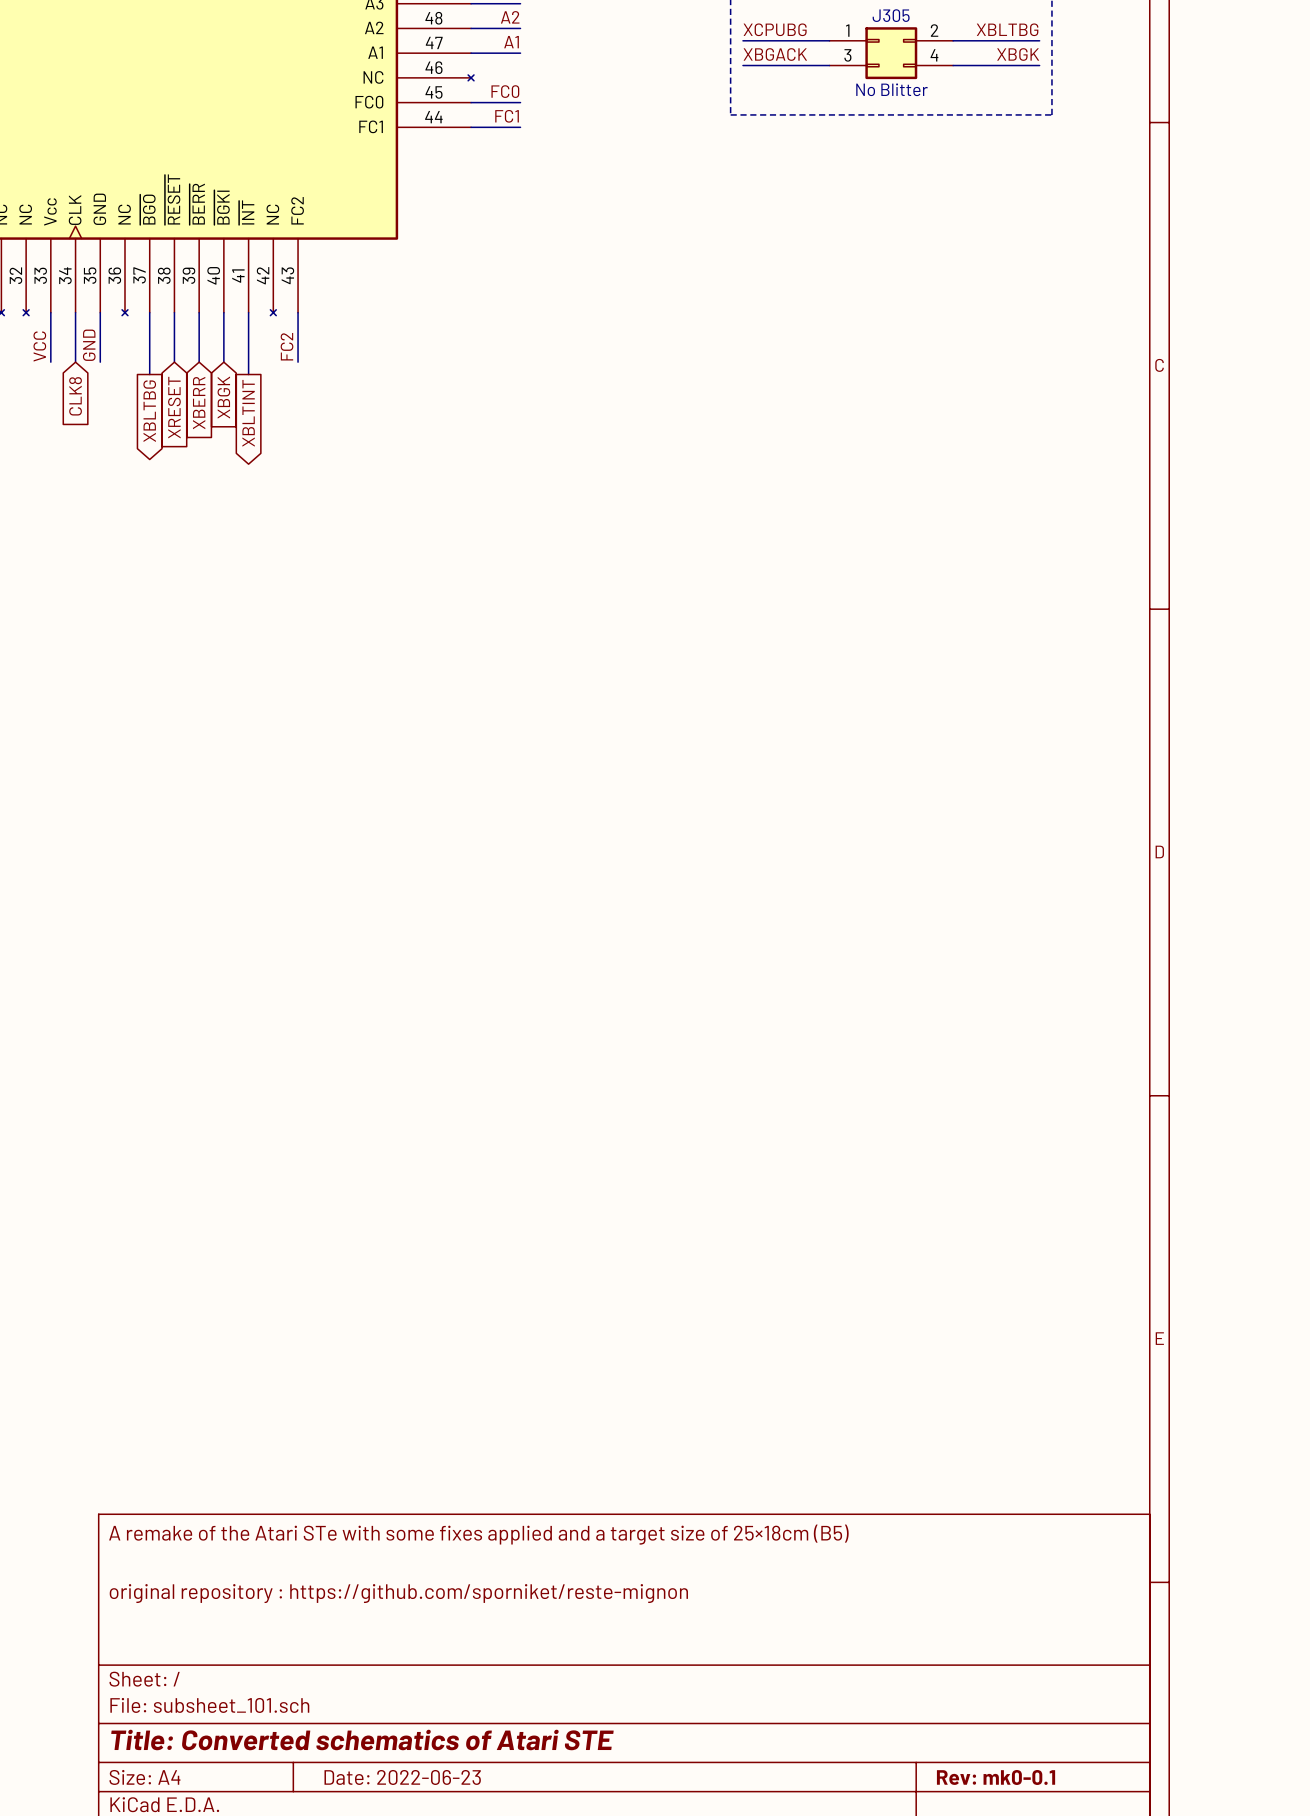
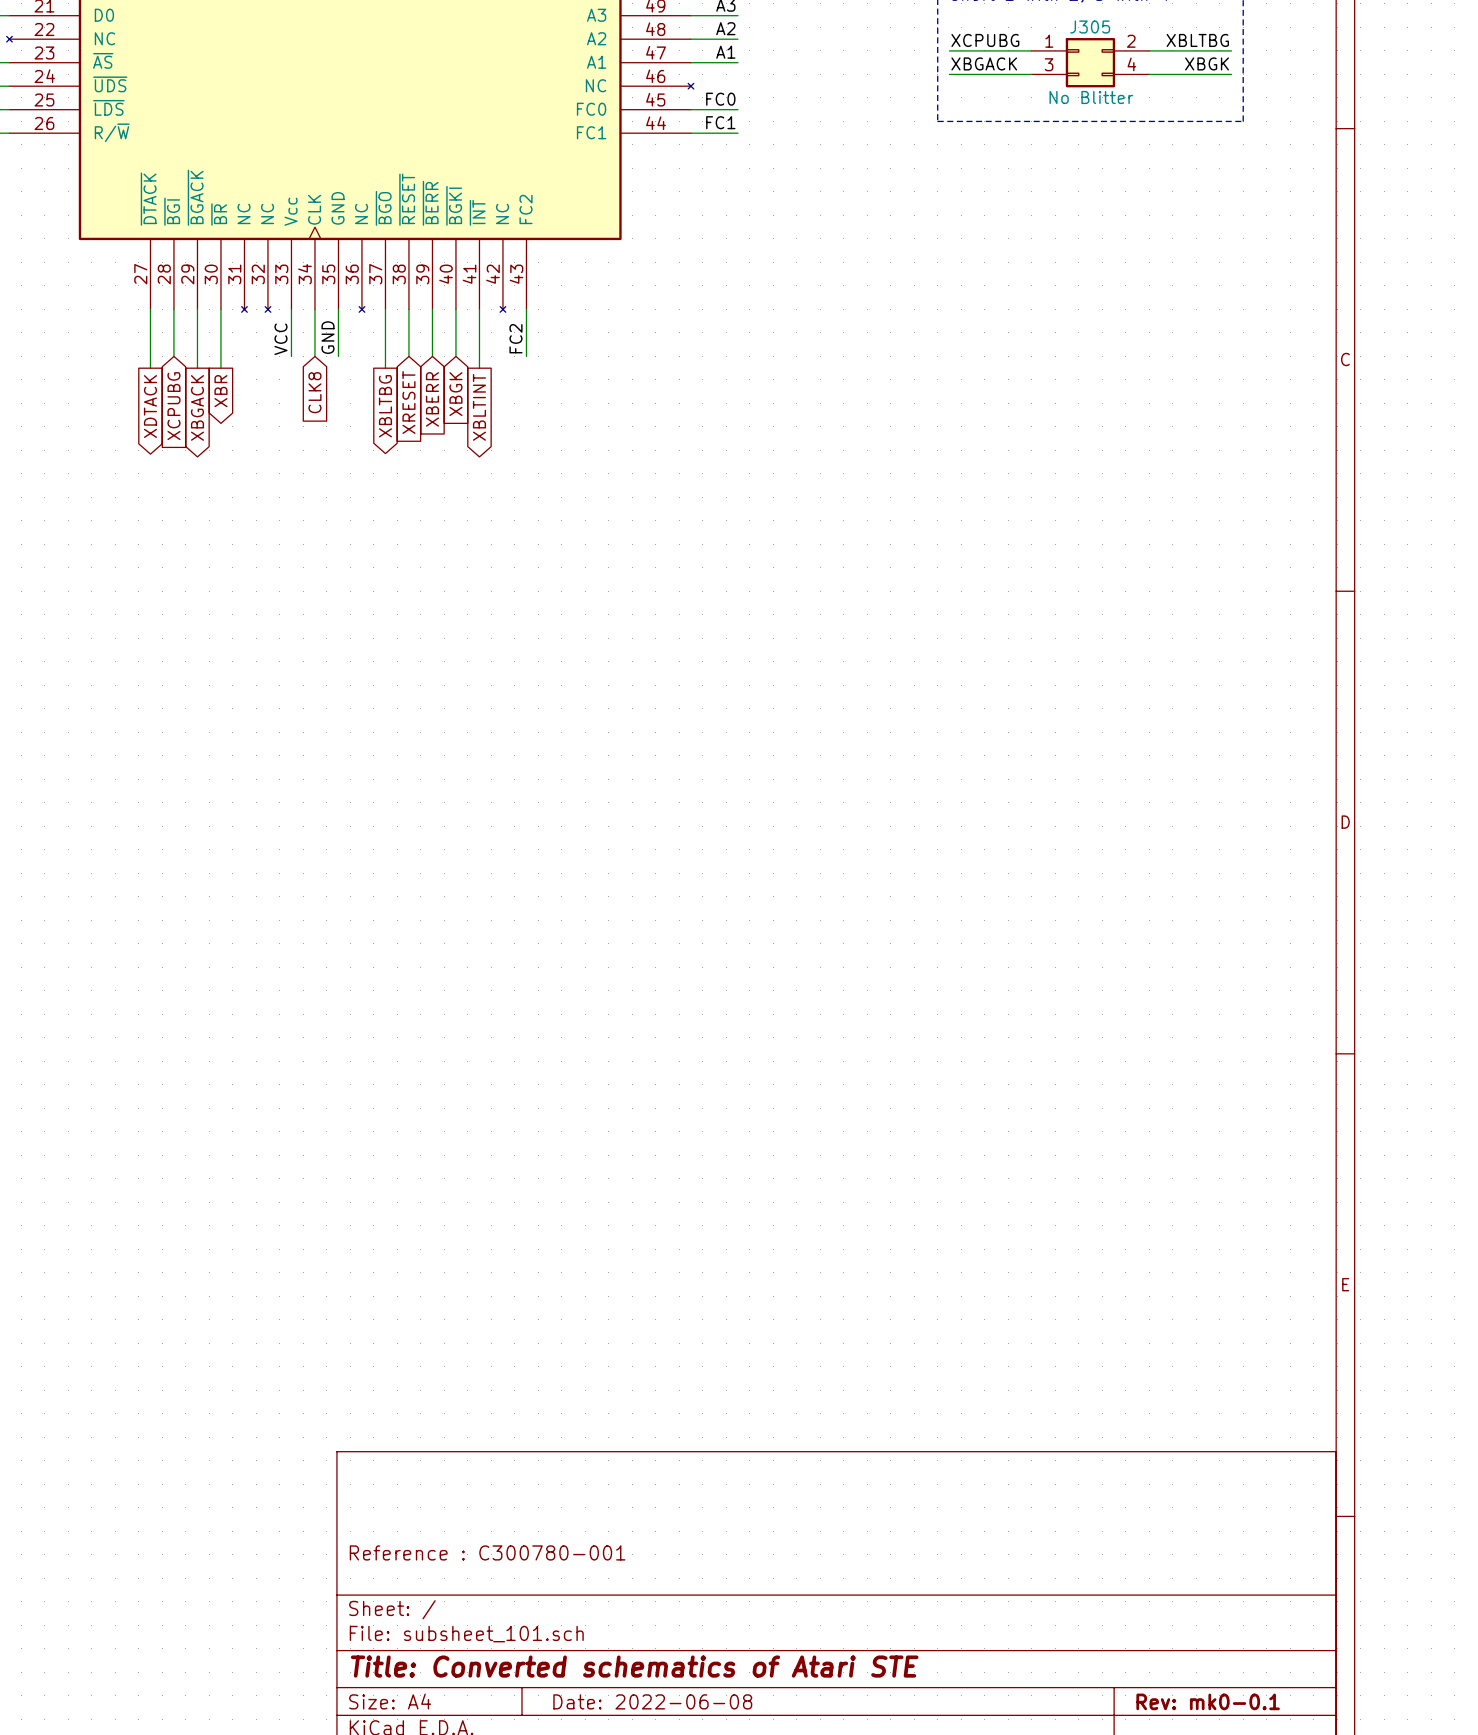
title block: A remake of the Atari STe with some fixes applied and a target size of 25×18cm (B5) (478, 1534) -> none
title block: original repository : https://github.com/sporniket/reste-mignon (398, 1593) -> none
title block: none -> Reference : C300780-001 (487, 1552)
title block: Date: 2022-06-23 (402, 1777) -> Date: 2022-06-08 (652, 1701)

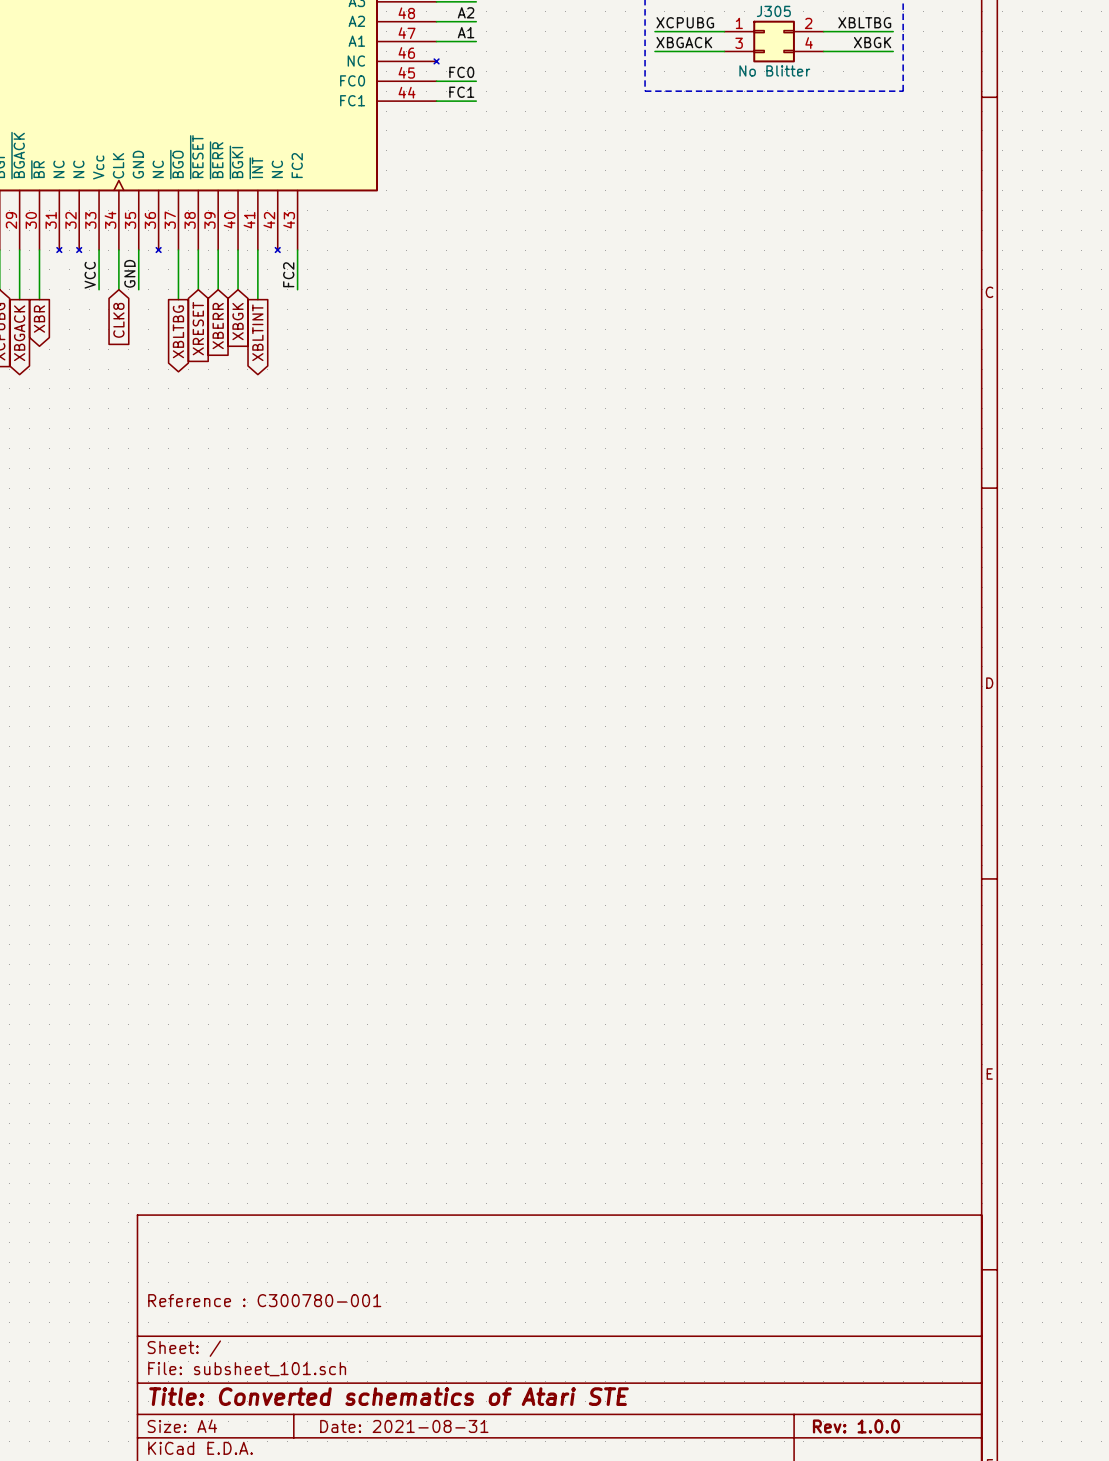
title block: Date: 2022-06-08 (652, 1701) -> Date: 2021-08-31 (404, 1426)
title block: Rev: mk0-0.1 (1208, 1701) -> Rev: 1.0.0 (856, 1426)

